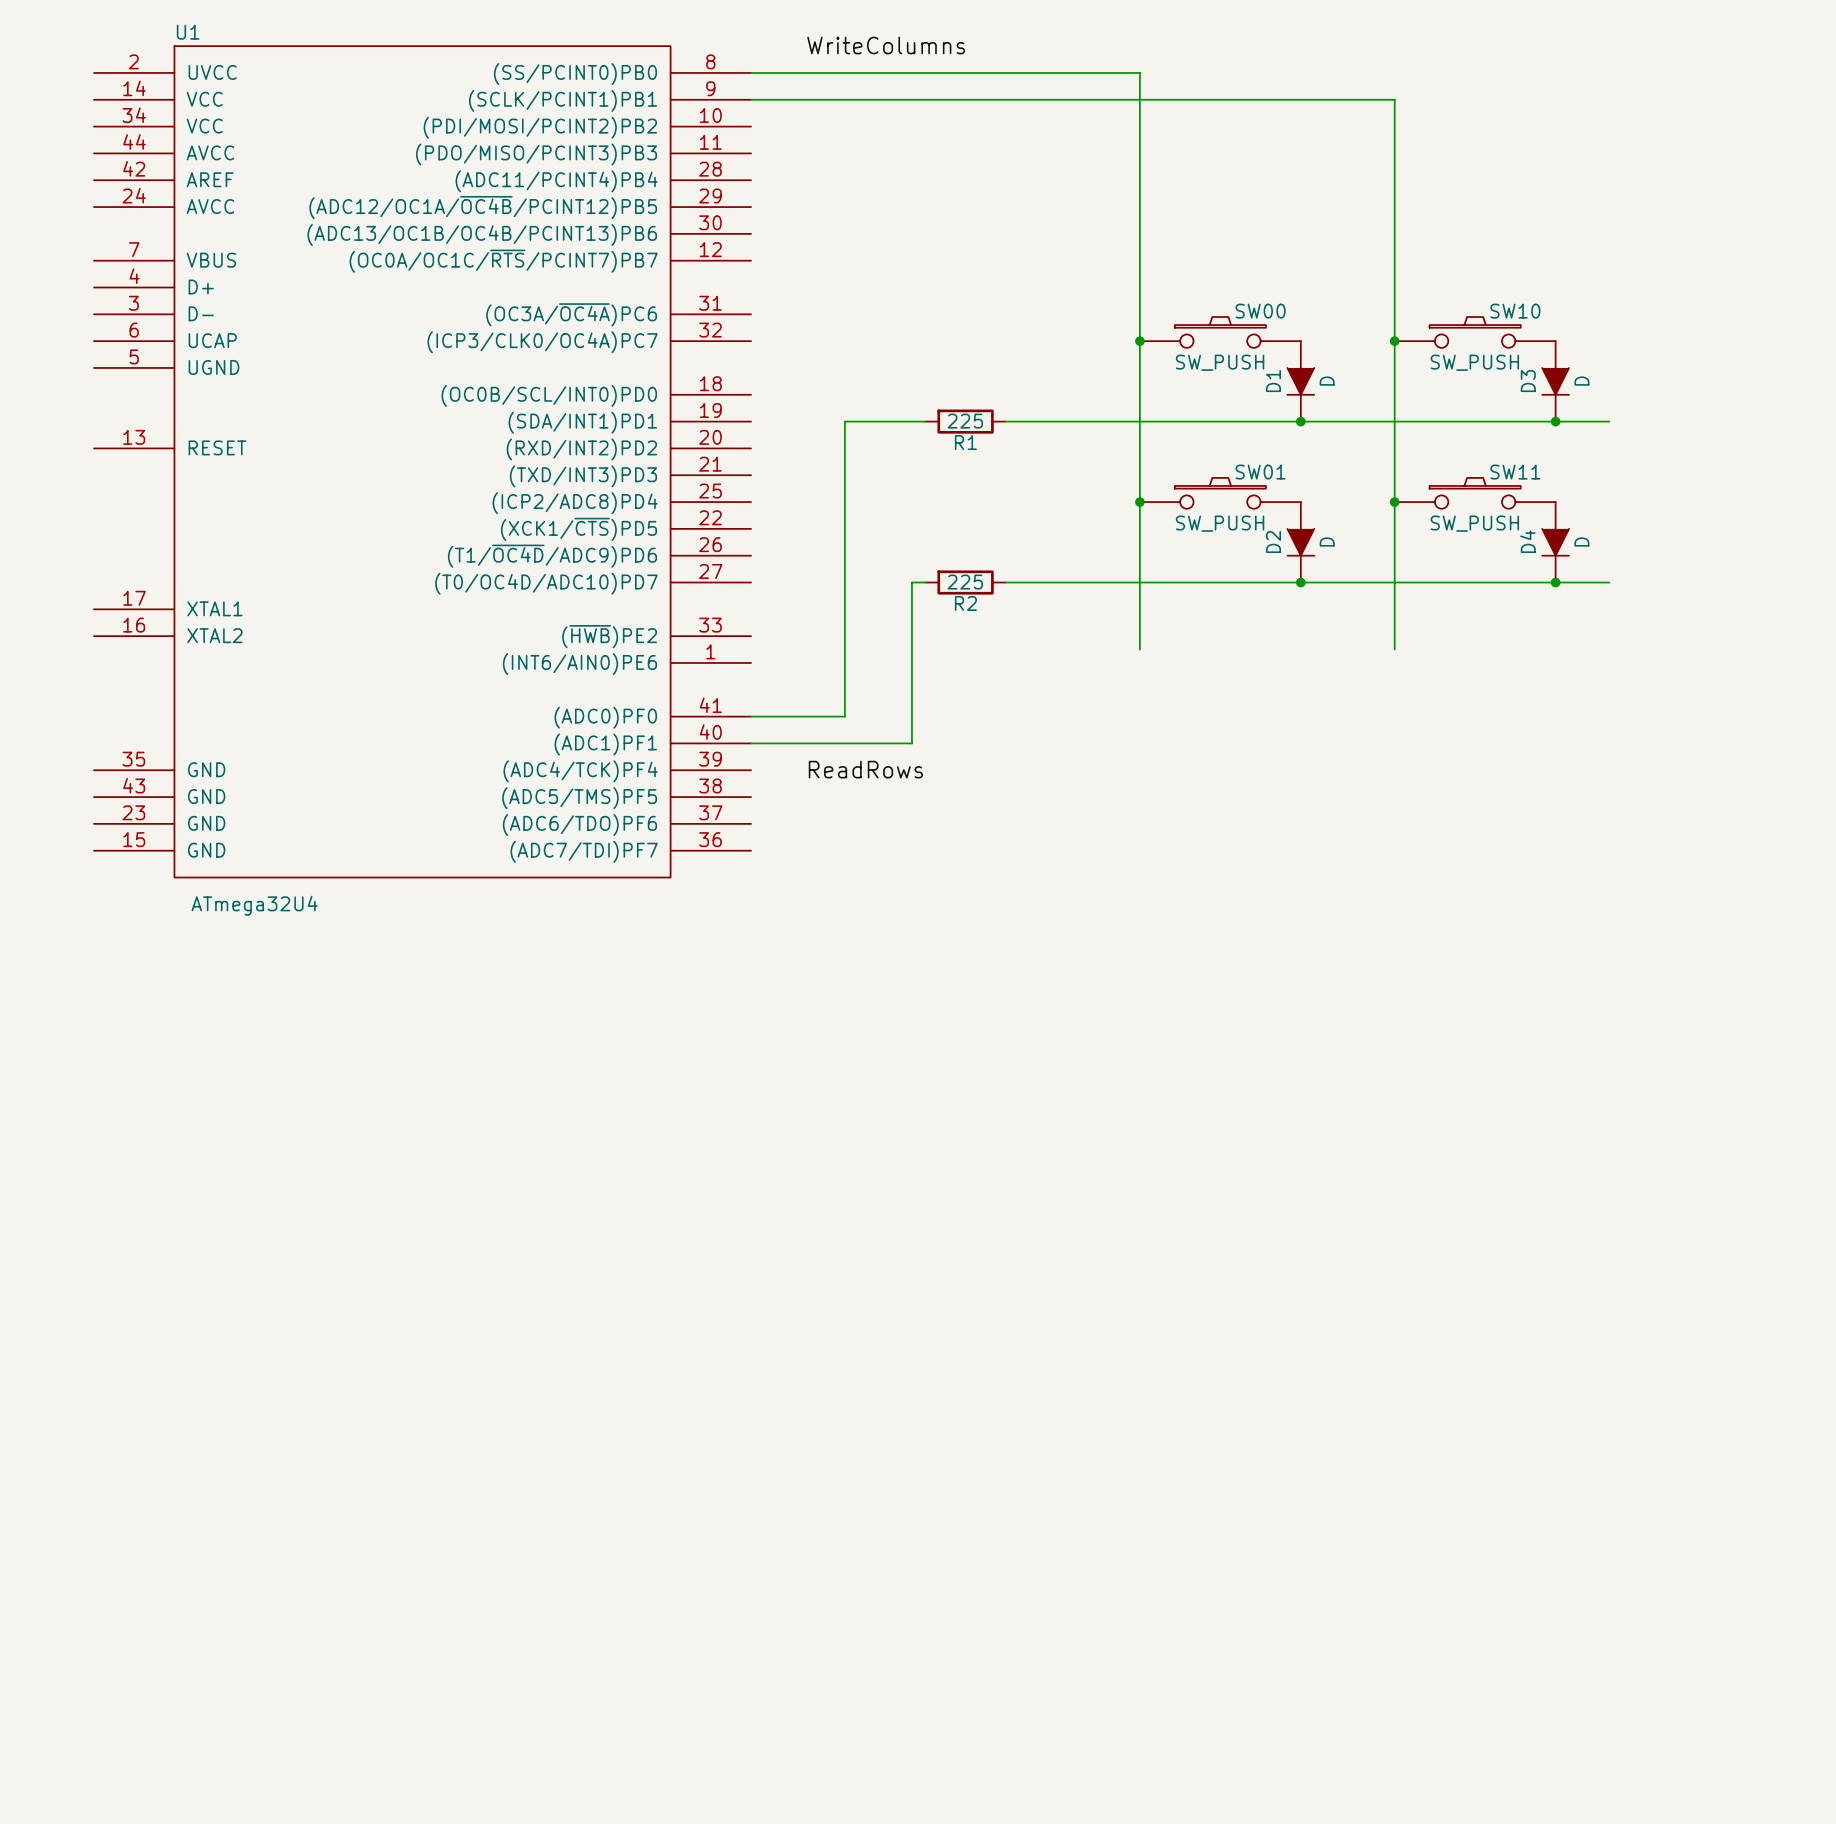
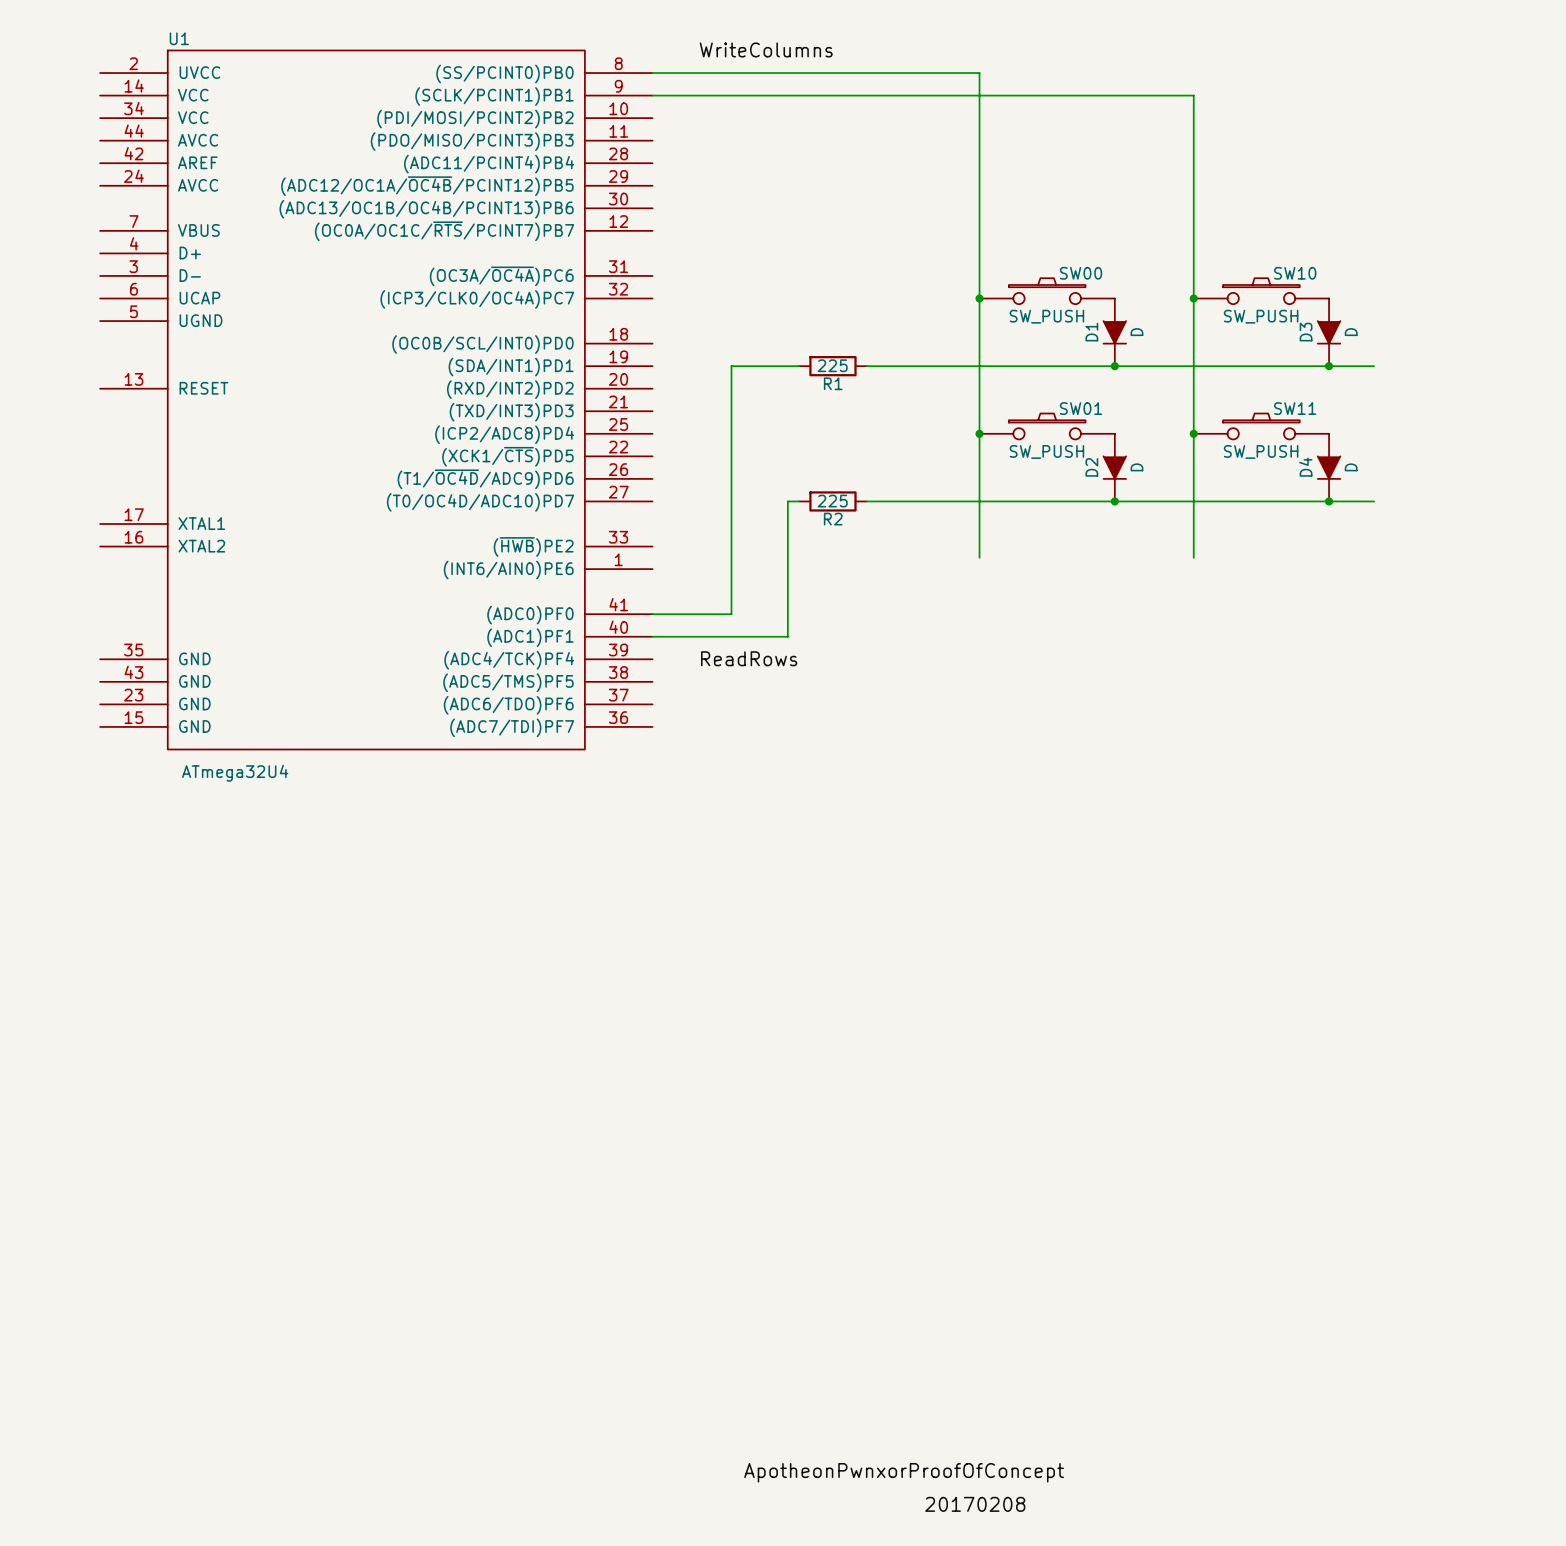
label: none -> ApotheonPwnxorProofOfConcept (904, 1472)
label: none -> 20170208 (975, 1504)

